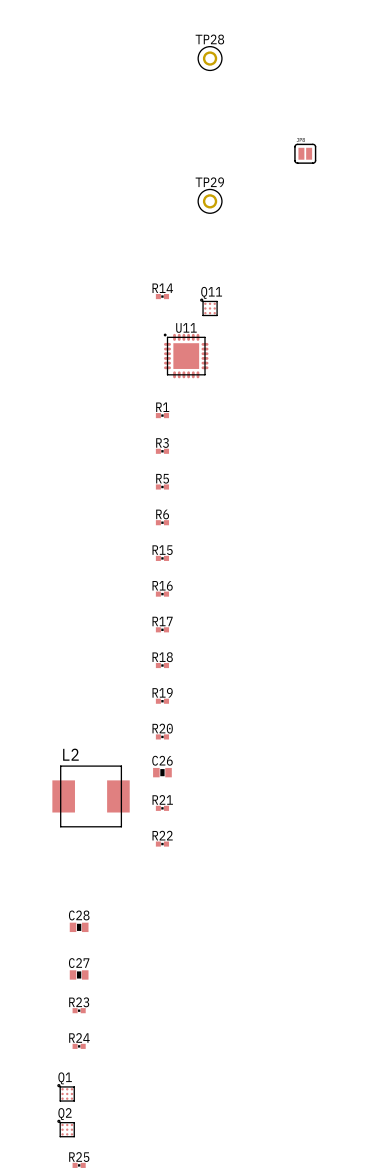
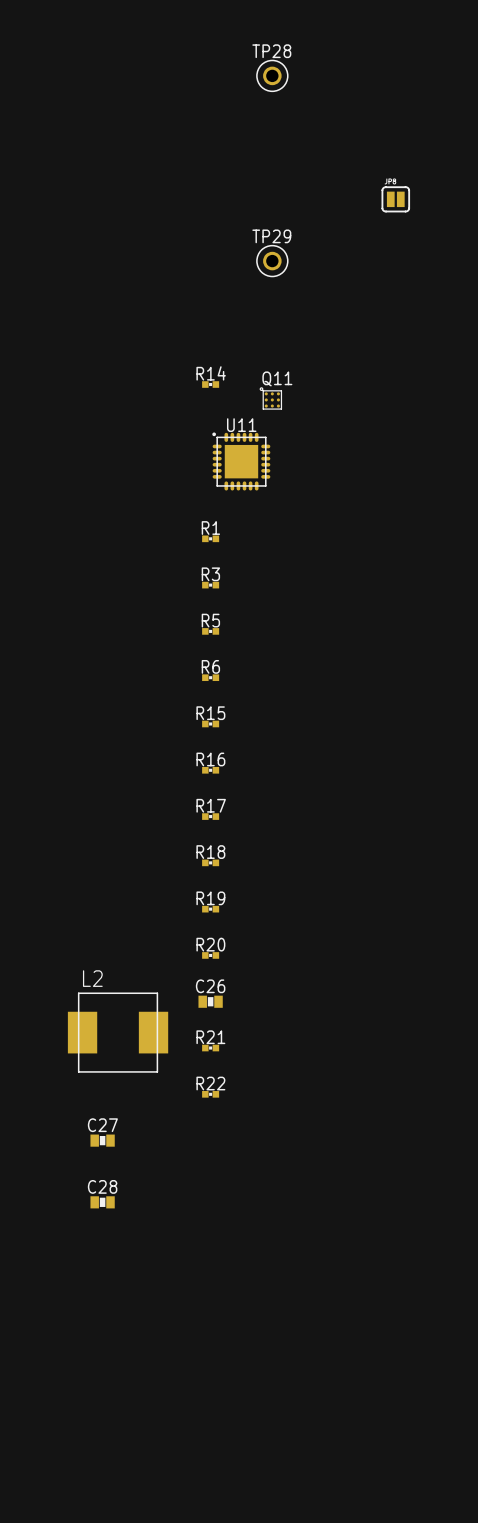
C27 position: (79, 974) -> (102, 1140)
R23: (79, 1010) -> none
R24: (79, 1046) -> none
Q1: (66, 1092) -> none
Q2: (66, 1128) -> none
R25: (79, 1165) -> none

